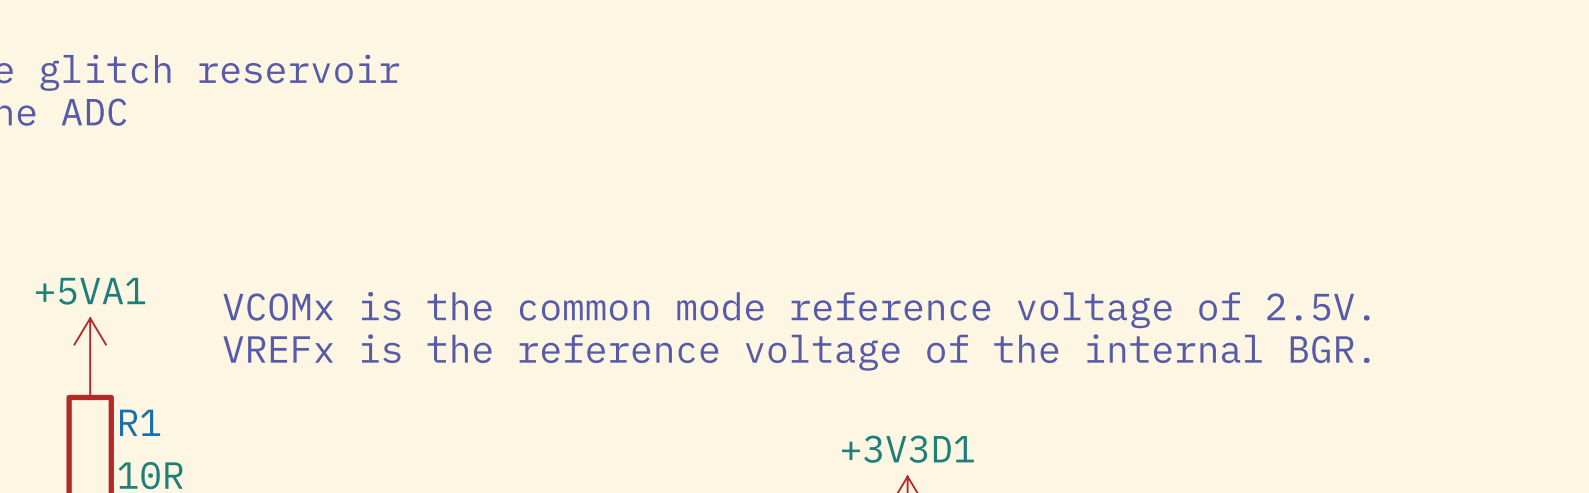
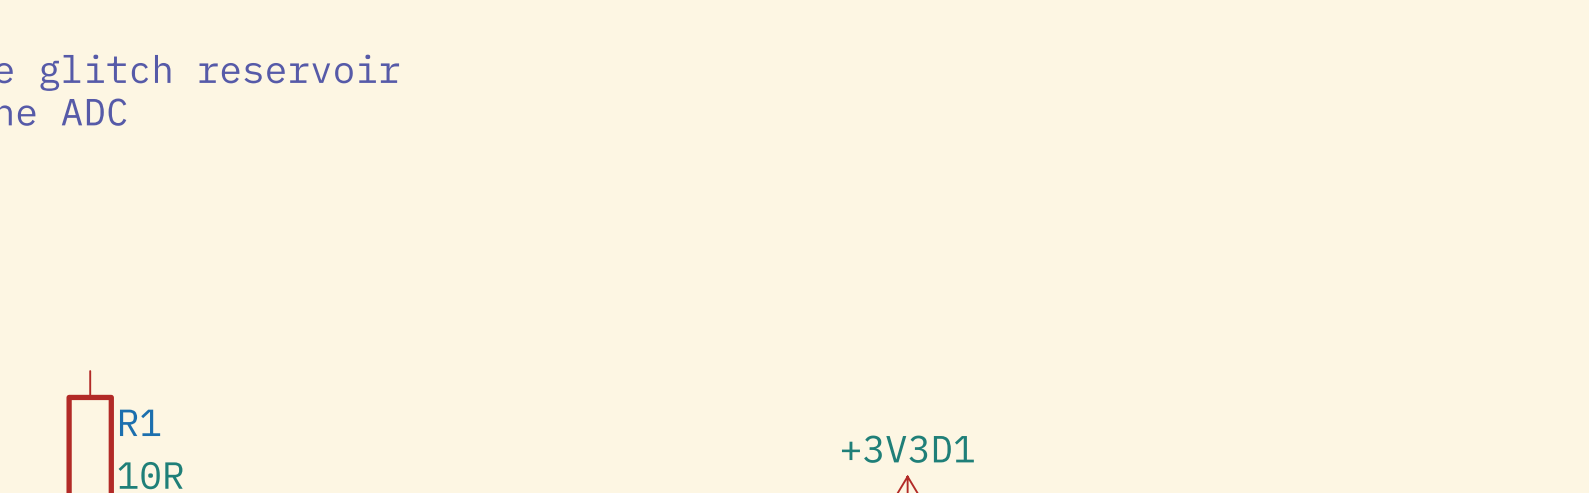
text: VCOMx is the common mode reference voltage of 2.5V. (796, 310) -> none
power symbol: +5VA1 (90, 344) -> none
text: VREFx is the reference voltage of the internal BGR. (796, 352) -> none

